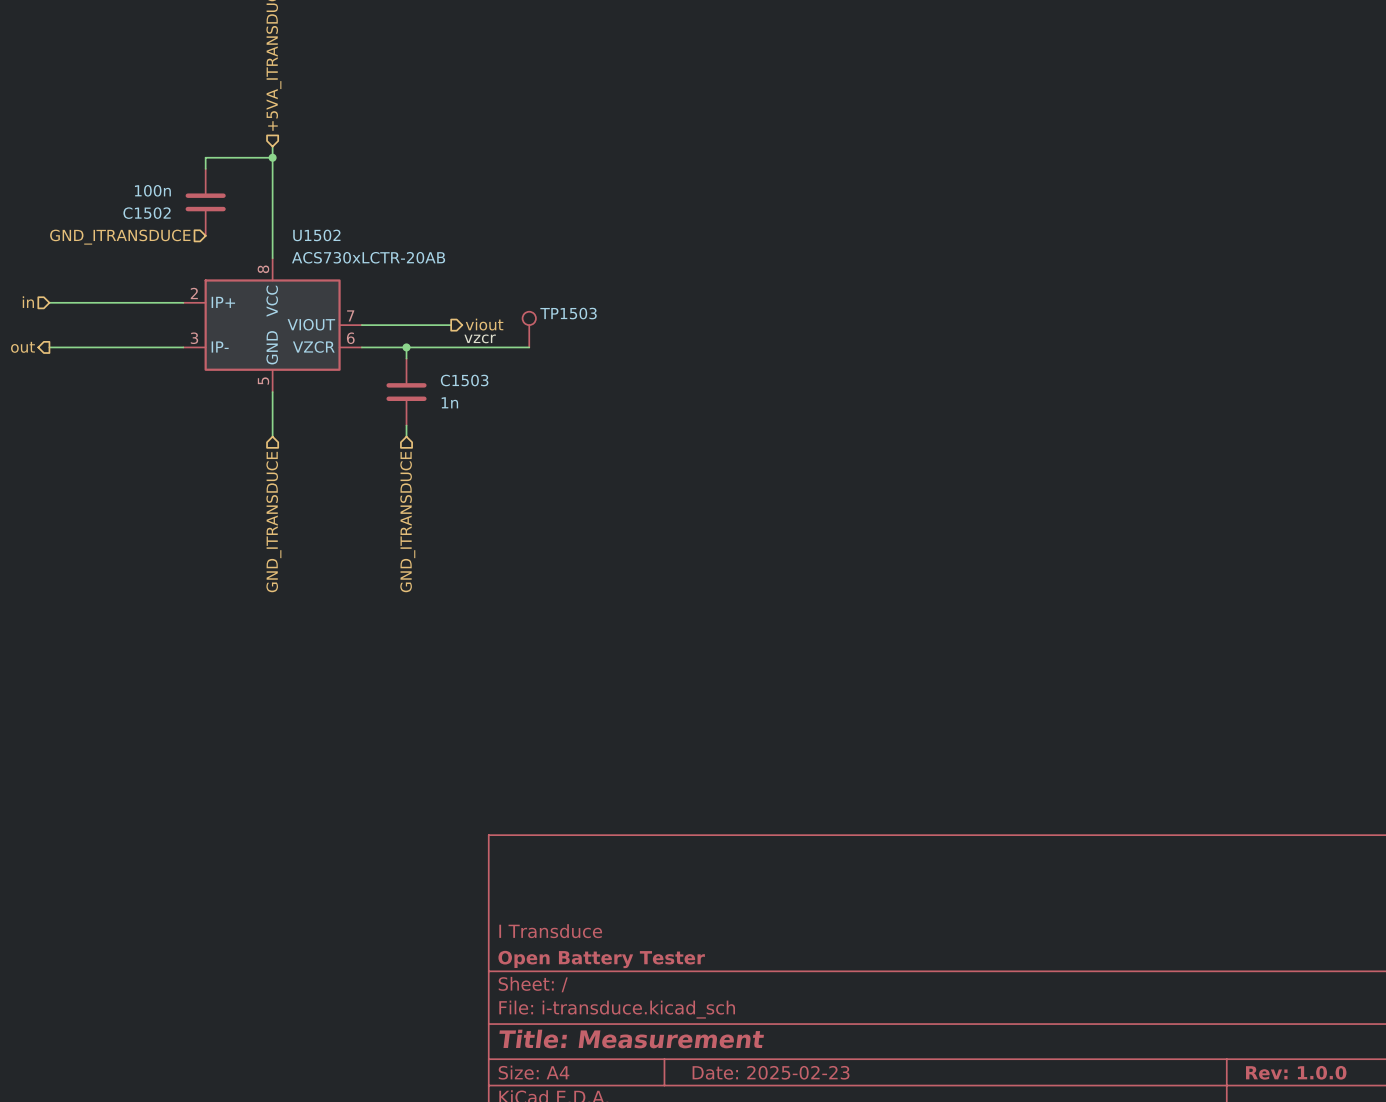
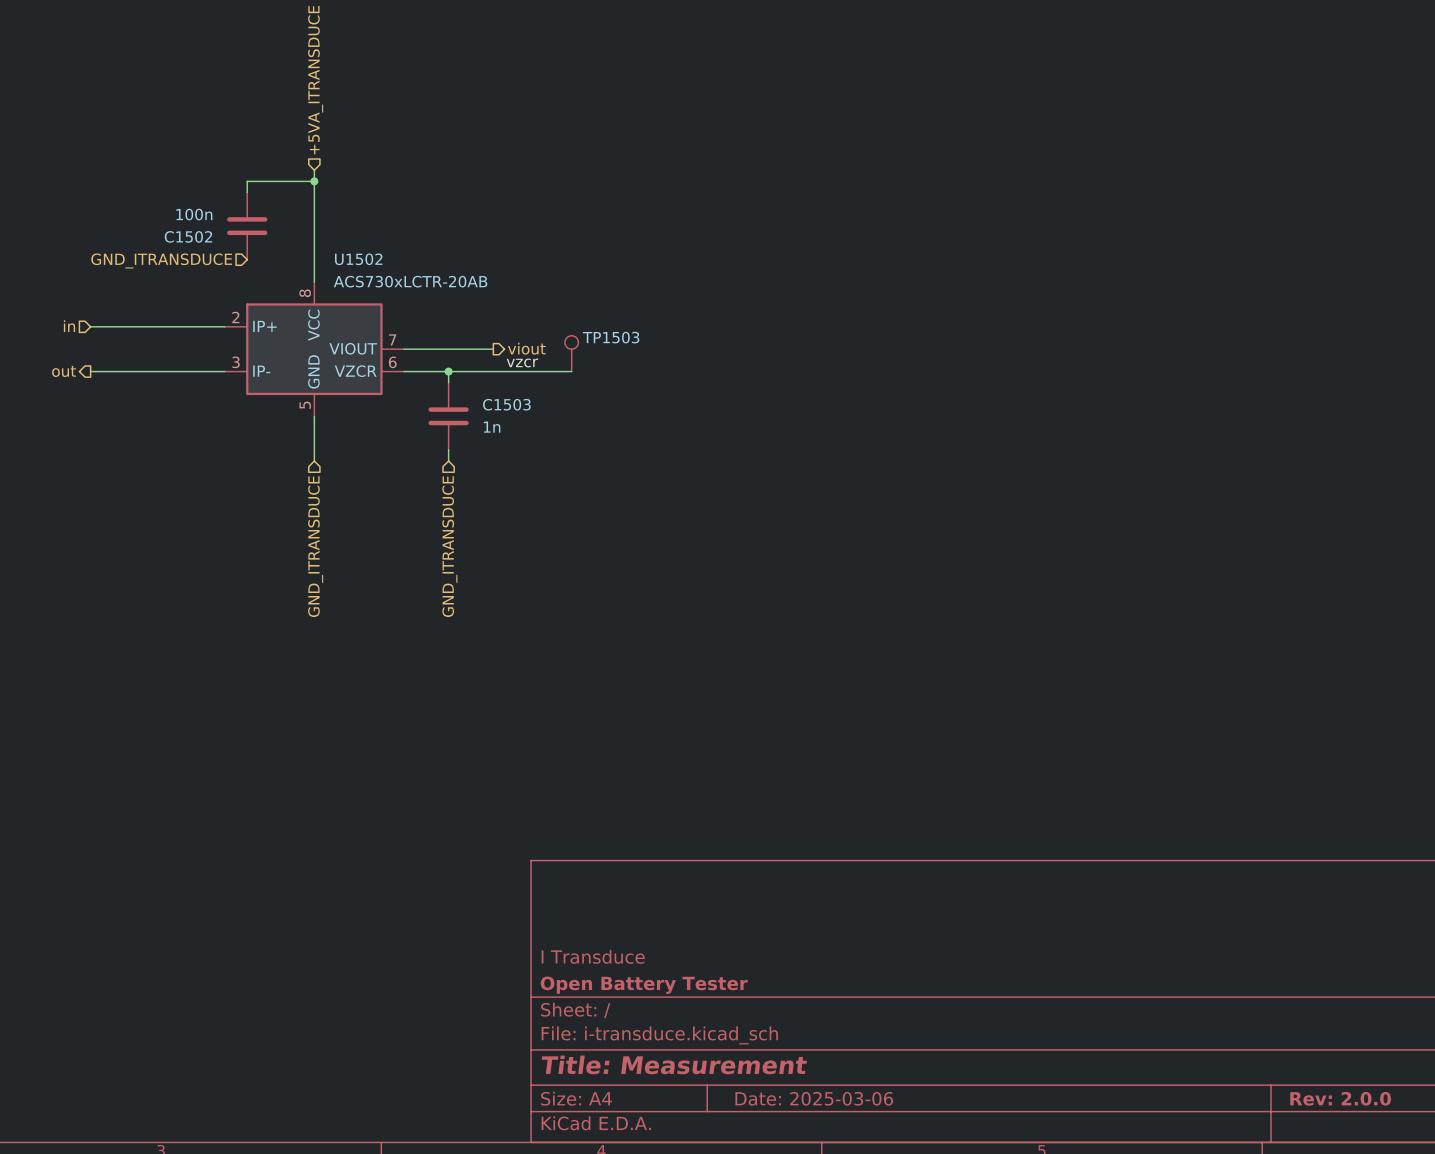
title block: Date: 2025-02-23 (771, 1072) -> Date: 2025-03-06 (814, 1098)
title block: Rev: 1.0.0 (1296, 1072) -> Rev: 2.0.0 (1340, 1098)

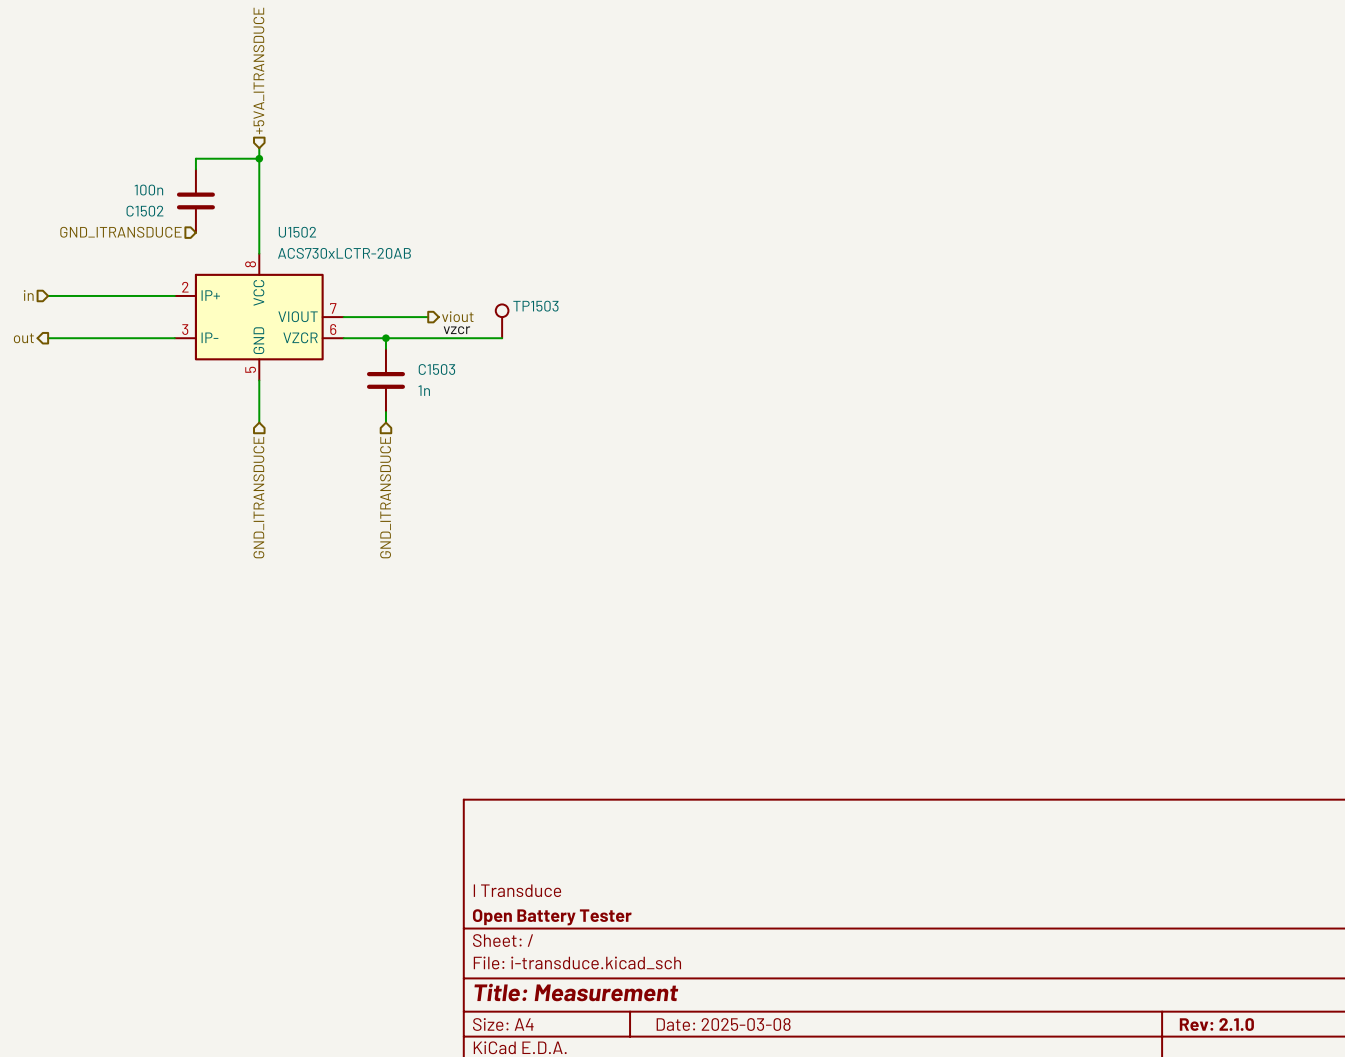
title block: Date: 2025-03-06 (814, 1098) -> Date: 2025-03-08 (723, 1024)
title block: Rev: 2.0.0 (1340, 1098) -> Rev: 2.1.0 (1216, 1024)

